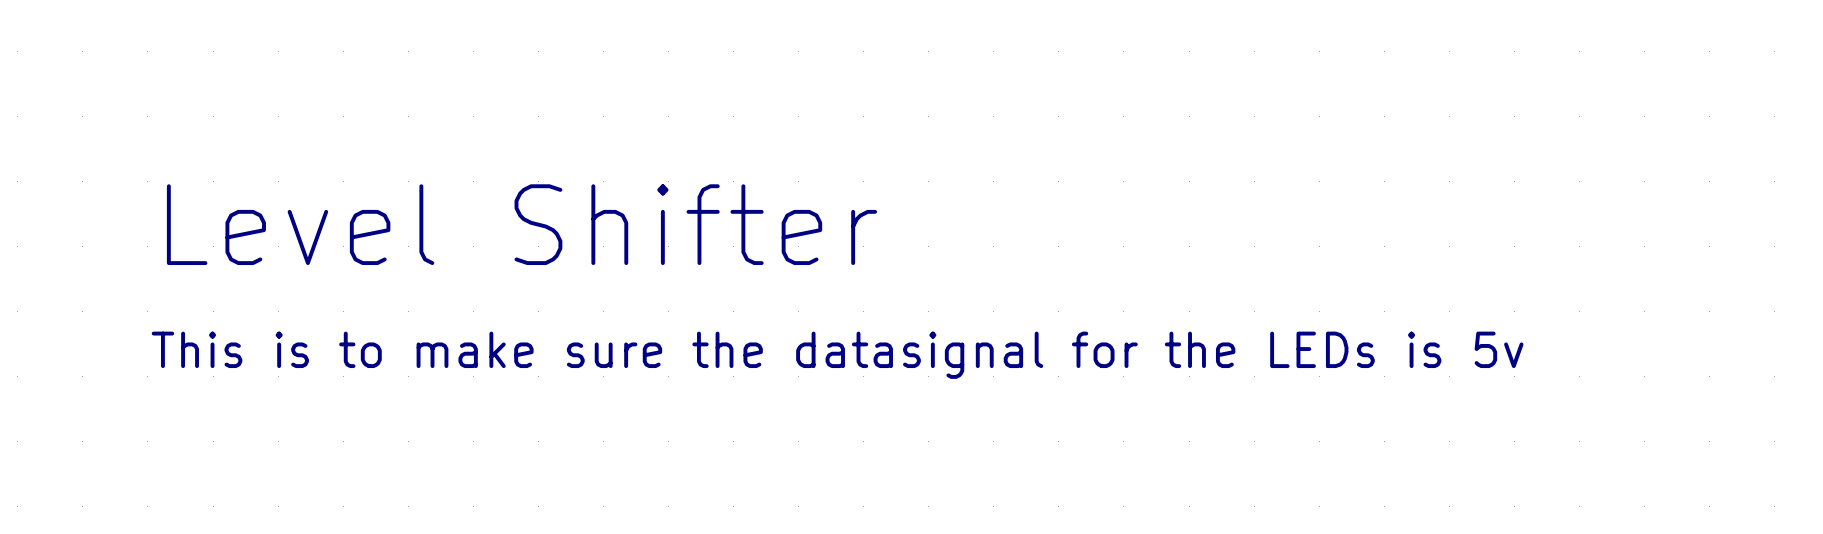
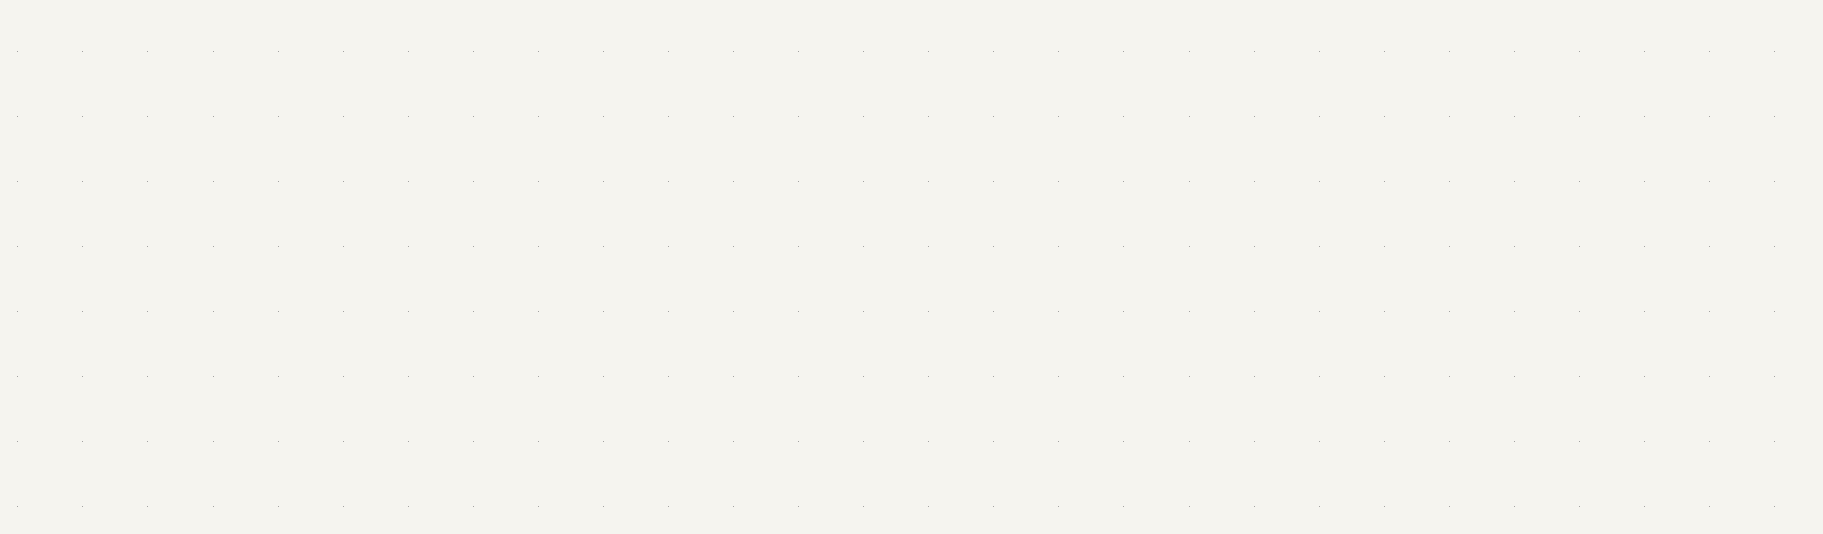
text: Level Shifter (521, 224) -> none
text: This is to make sure the datasignal for the LEDs is 5v (837, 355) -> none

